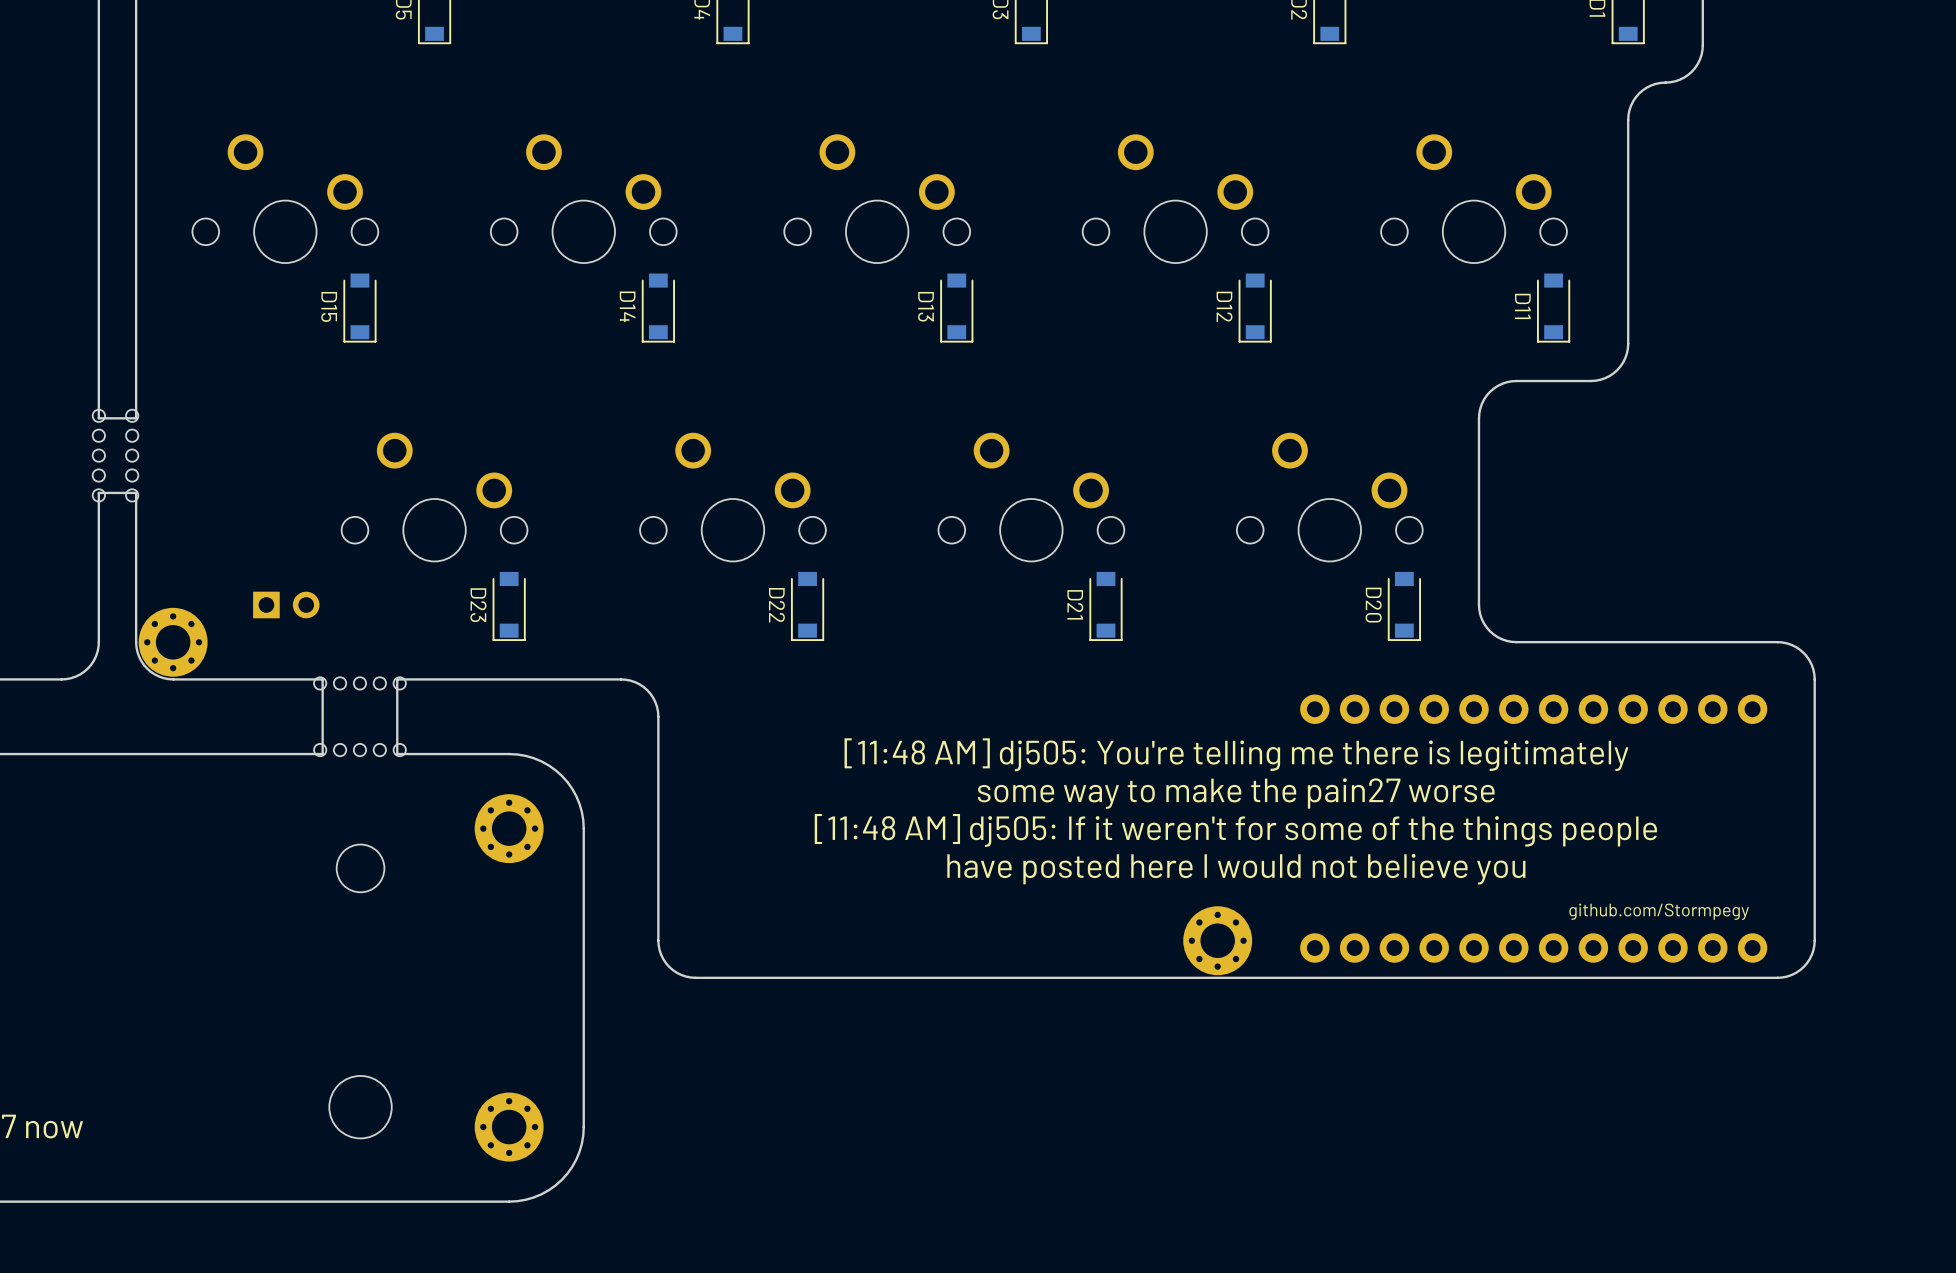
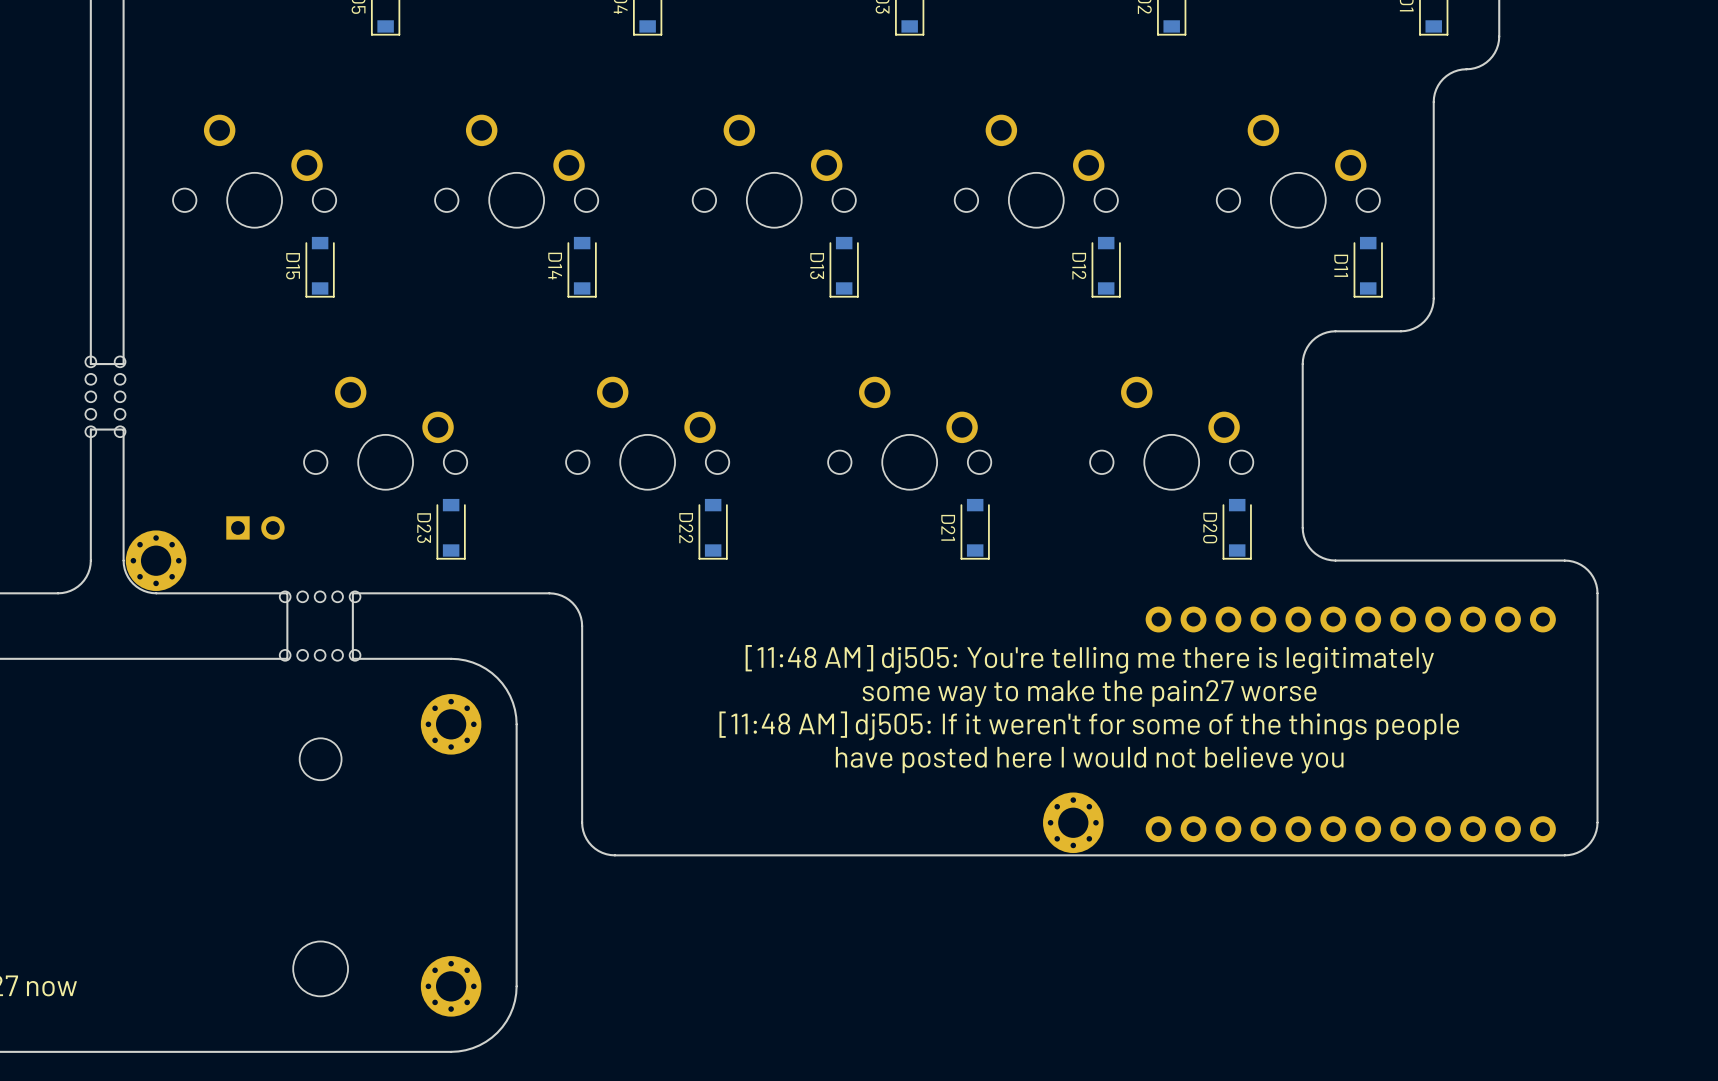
text: github.com/Stormpegy (1659, 911) -> none

